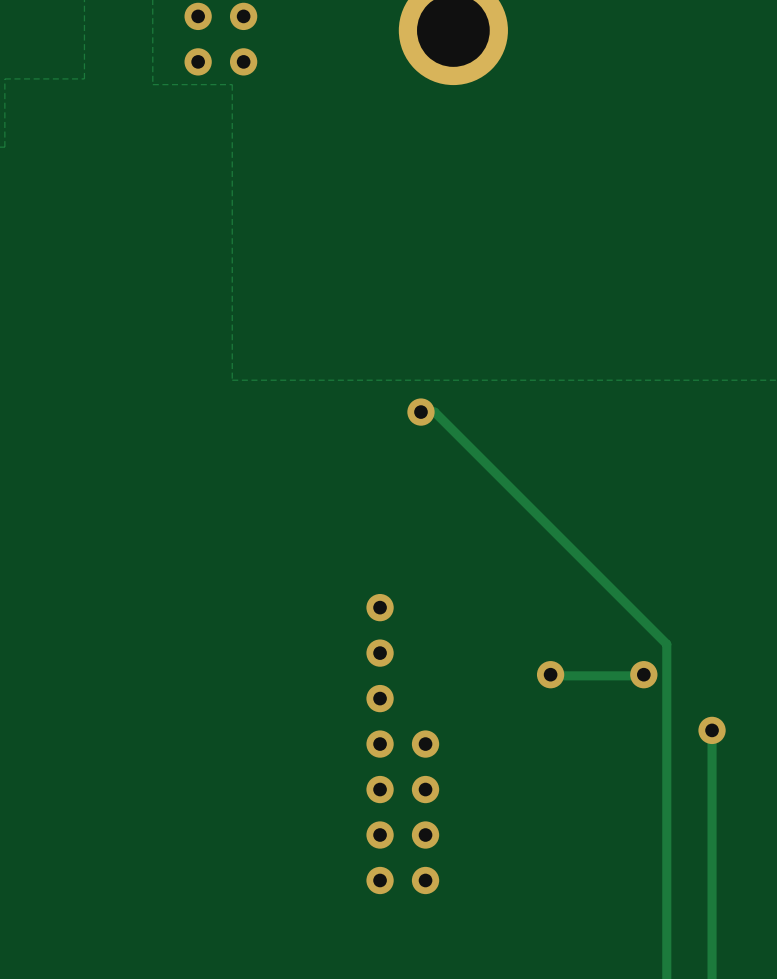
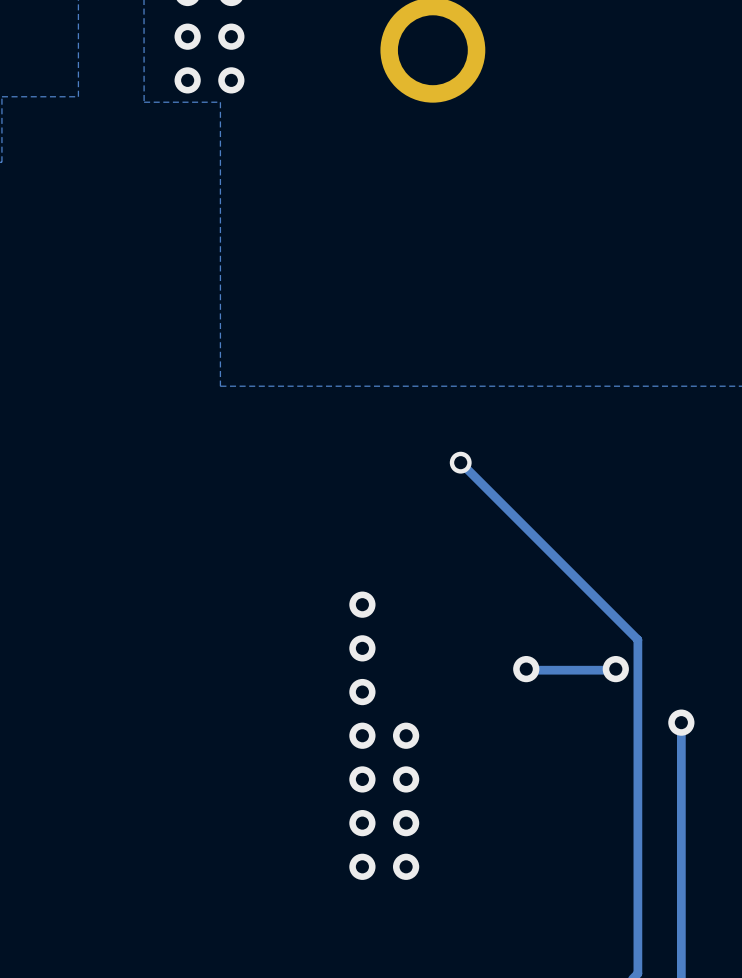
track: (420, 412) (434, 412) (482, 459) -> none
via: (420, 412) -> none
via: none -> (460, 462)

